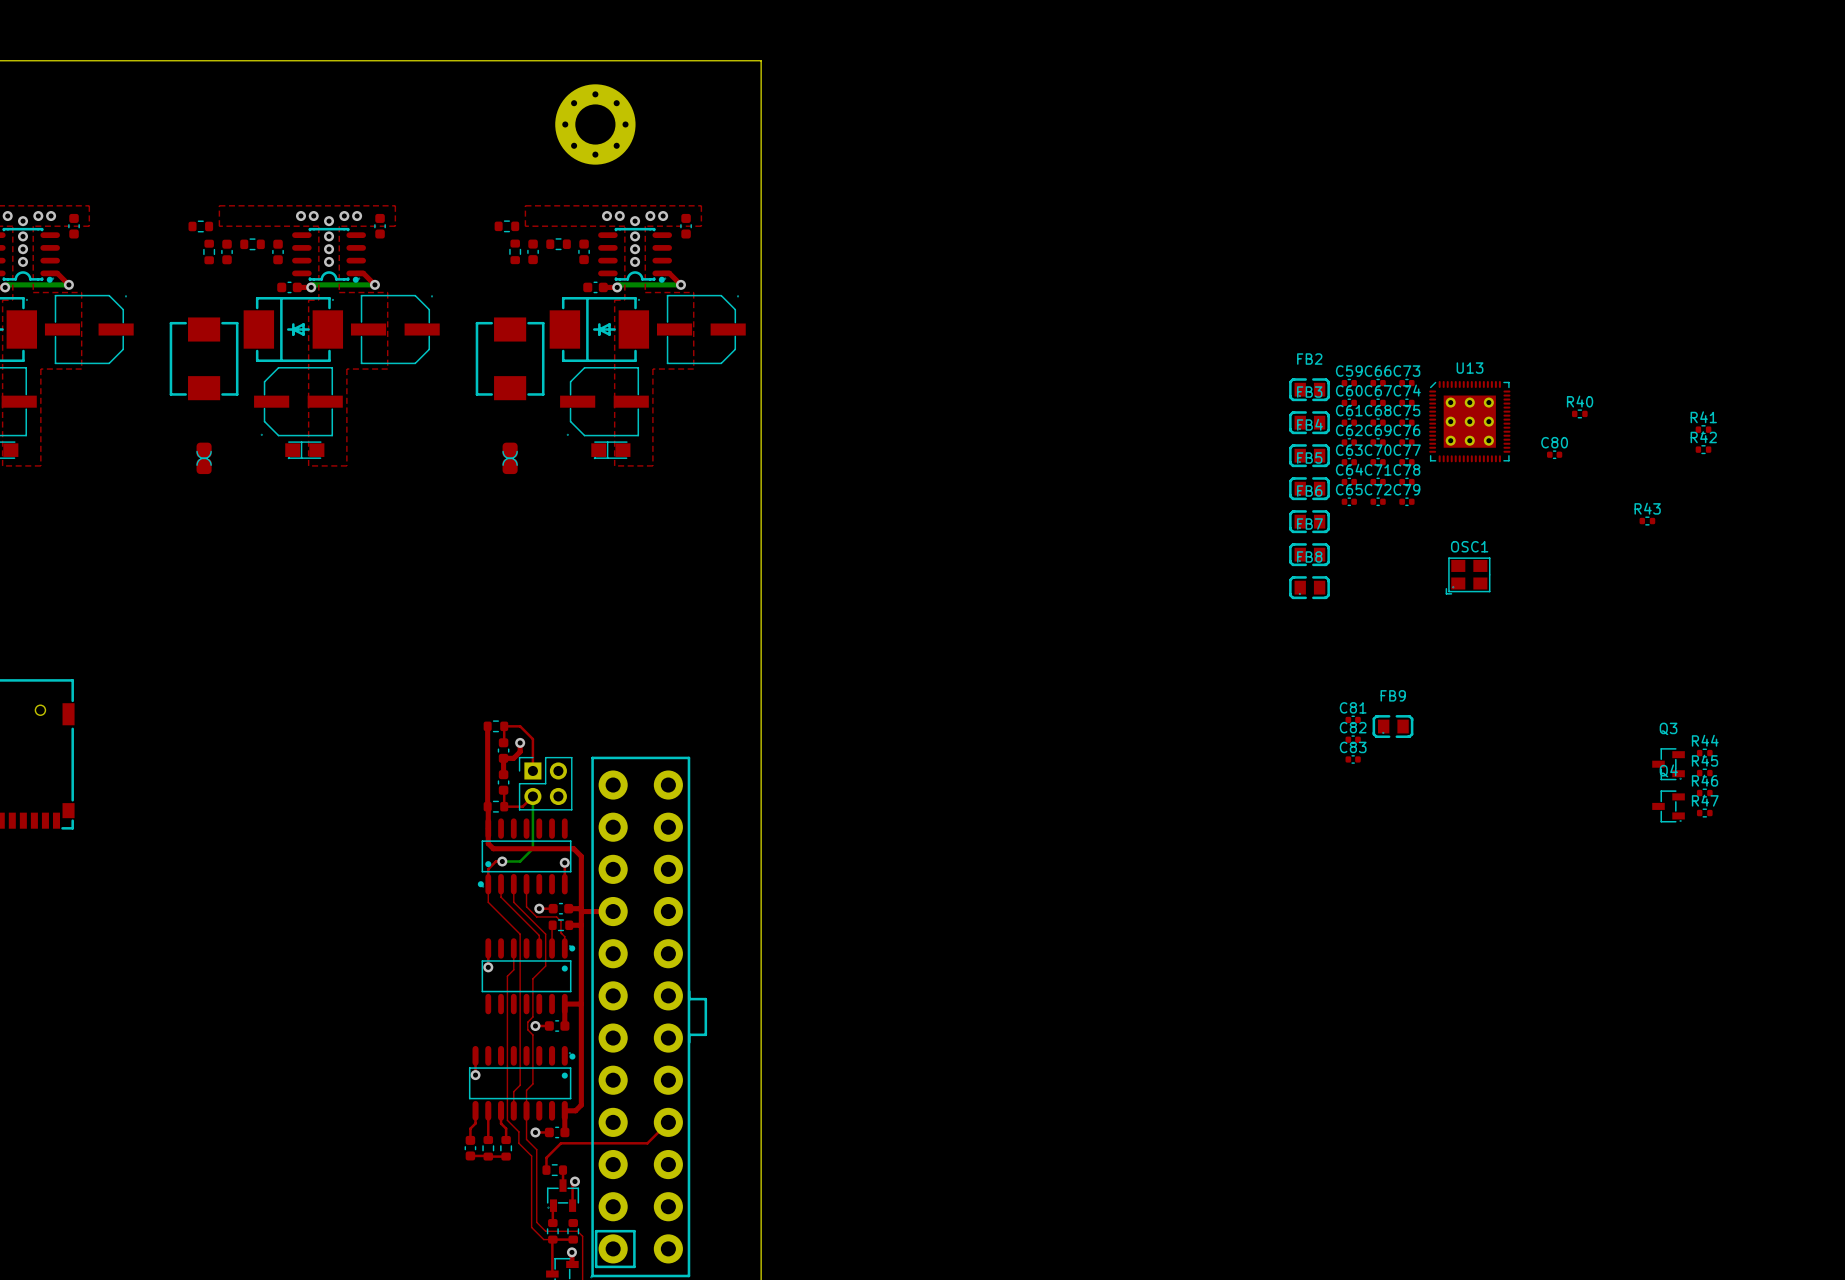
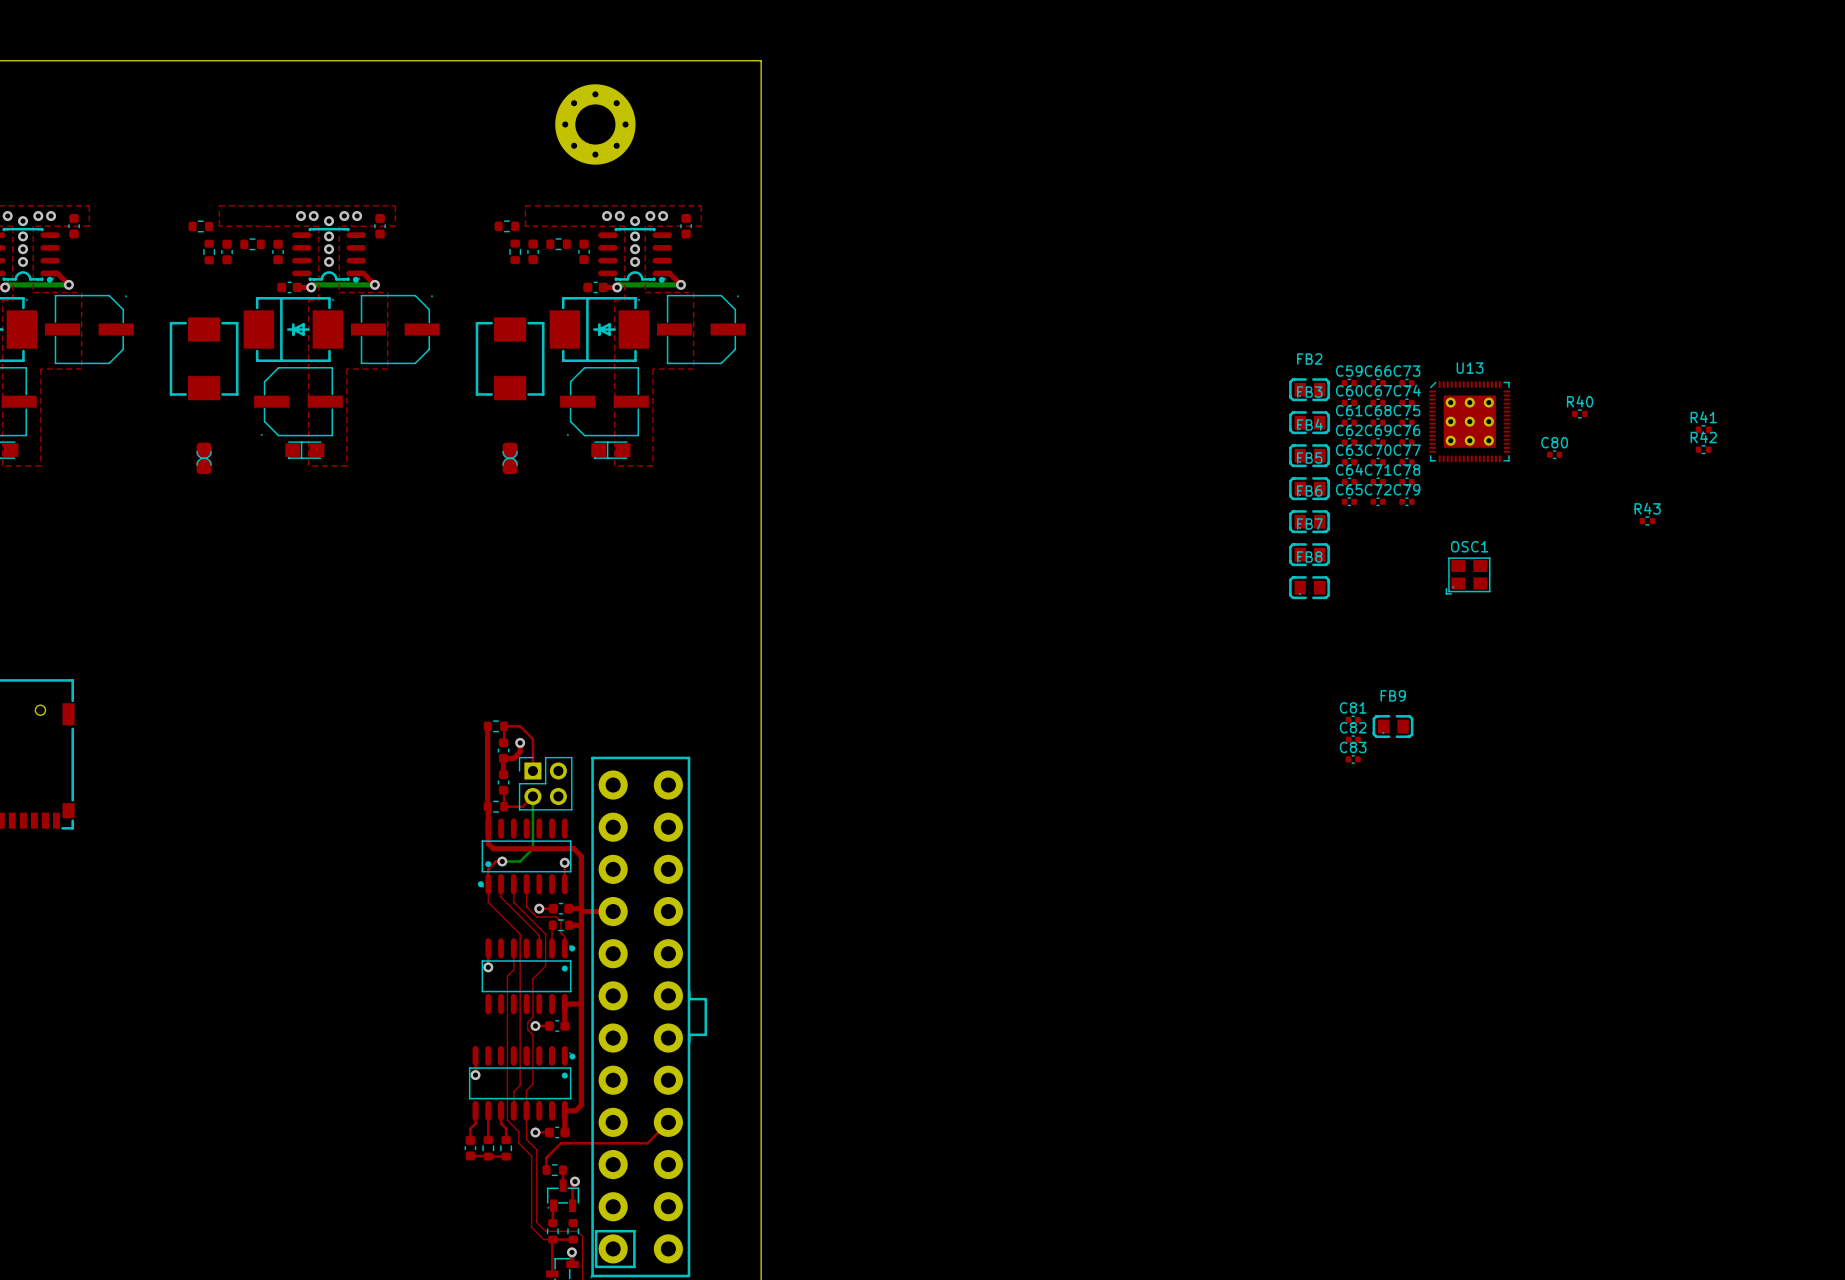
R44: (1704, 753) -> none
Q3: (1668, 764) -> none
R45: (1704, 773) -> none
R46: (1704, 793) -> none
Q4: (1668, 806) -> none
R47: (1704, 813) -> none

